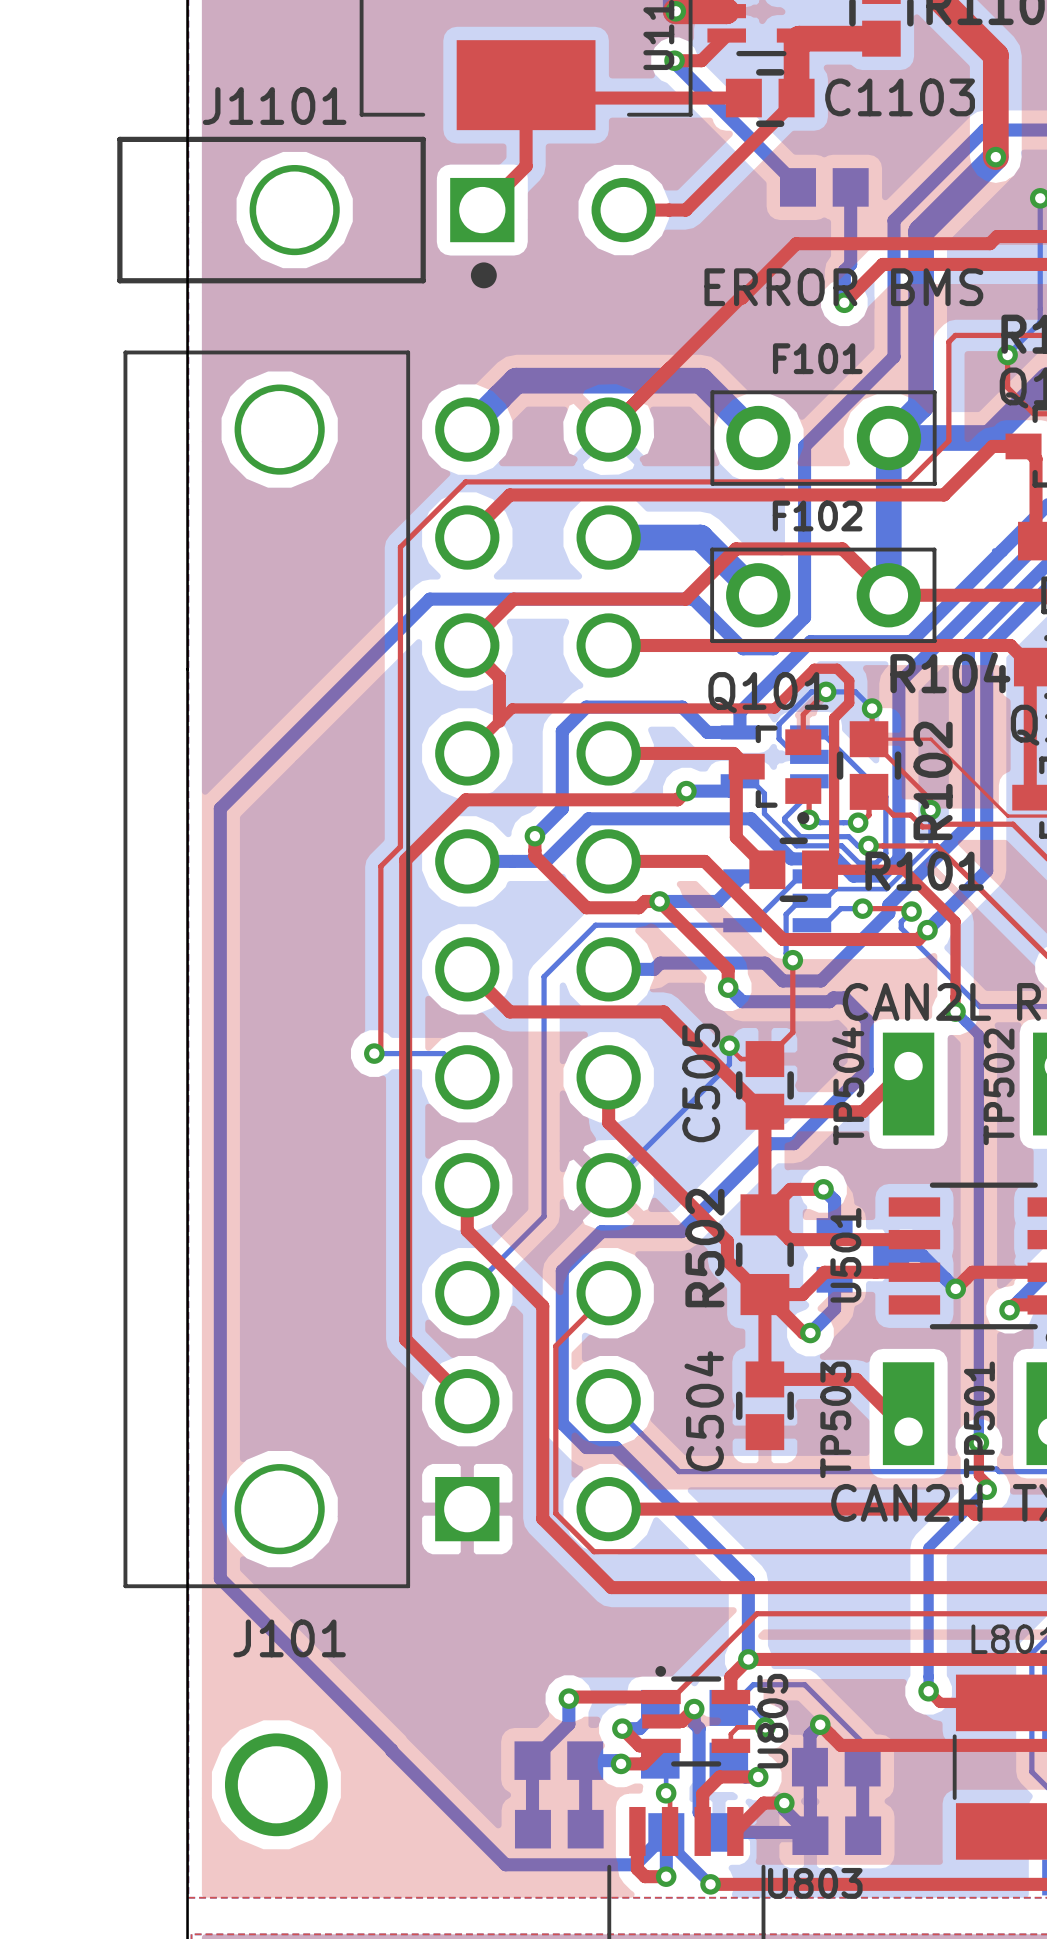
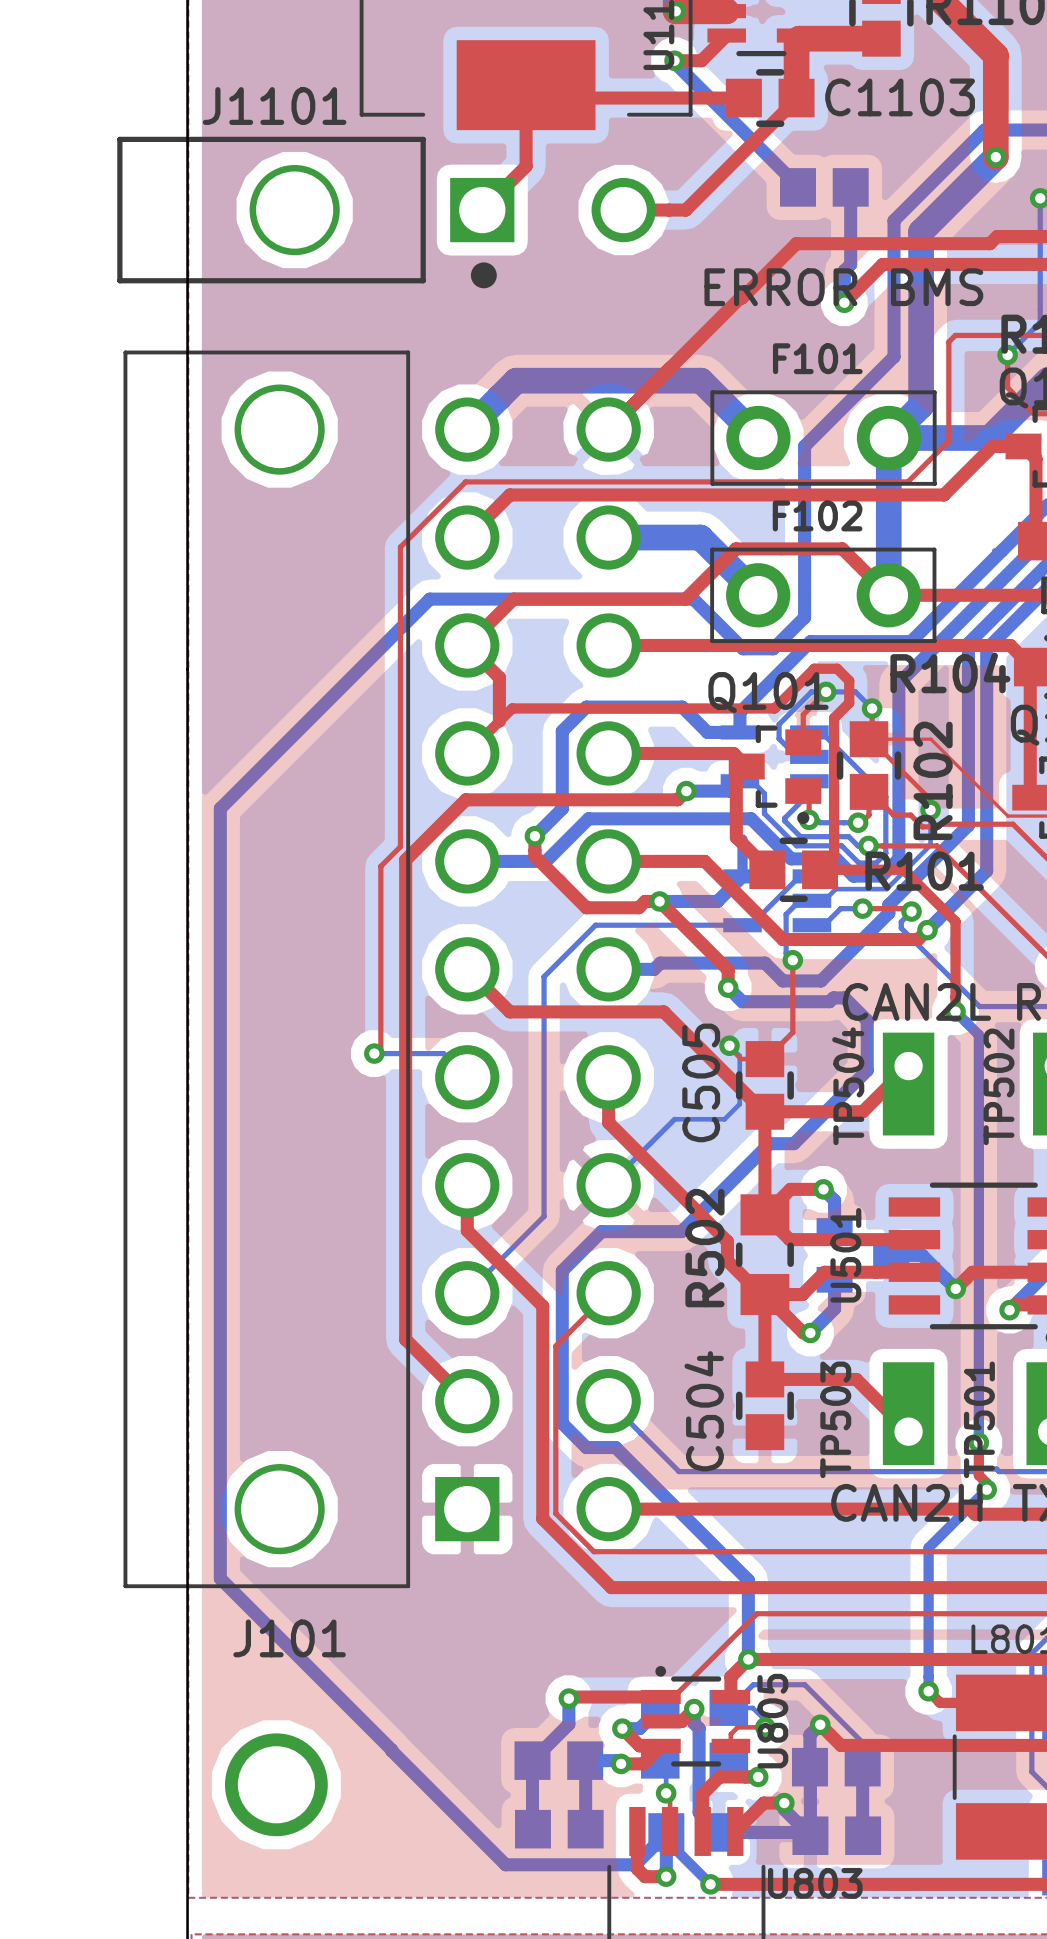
bottom track: none -> (742, 839) (742, 876)
bottom track: (729, 1045) (729, 1064) (674, 1119) -> (729, 1045) (739, 1056) (739, 1104) (724, 1119) (674, 1119)

